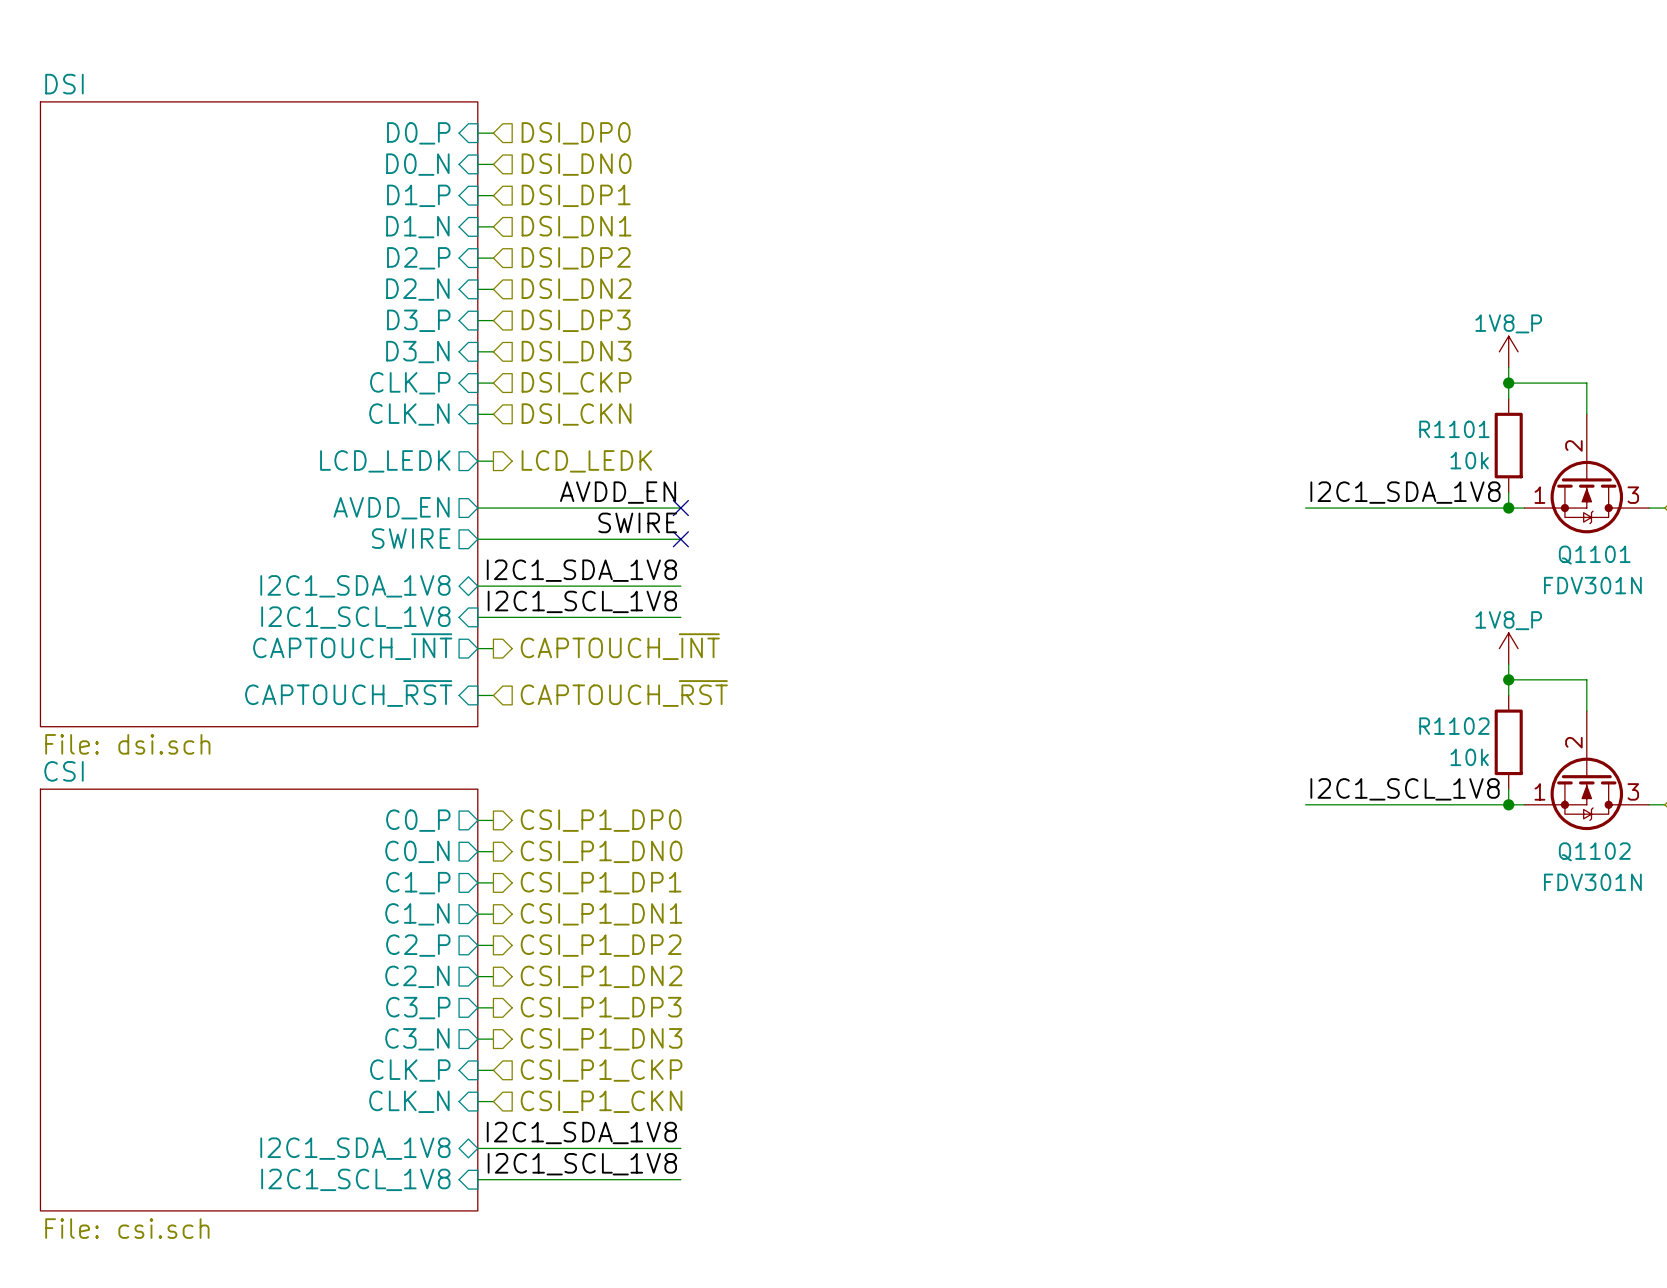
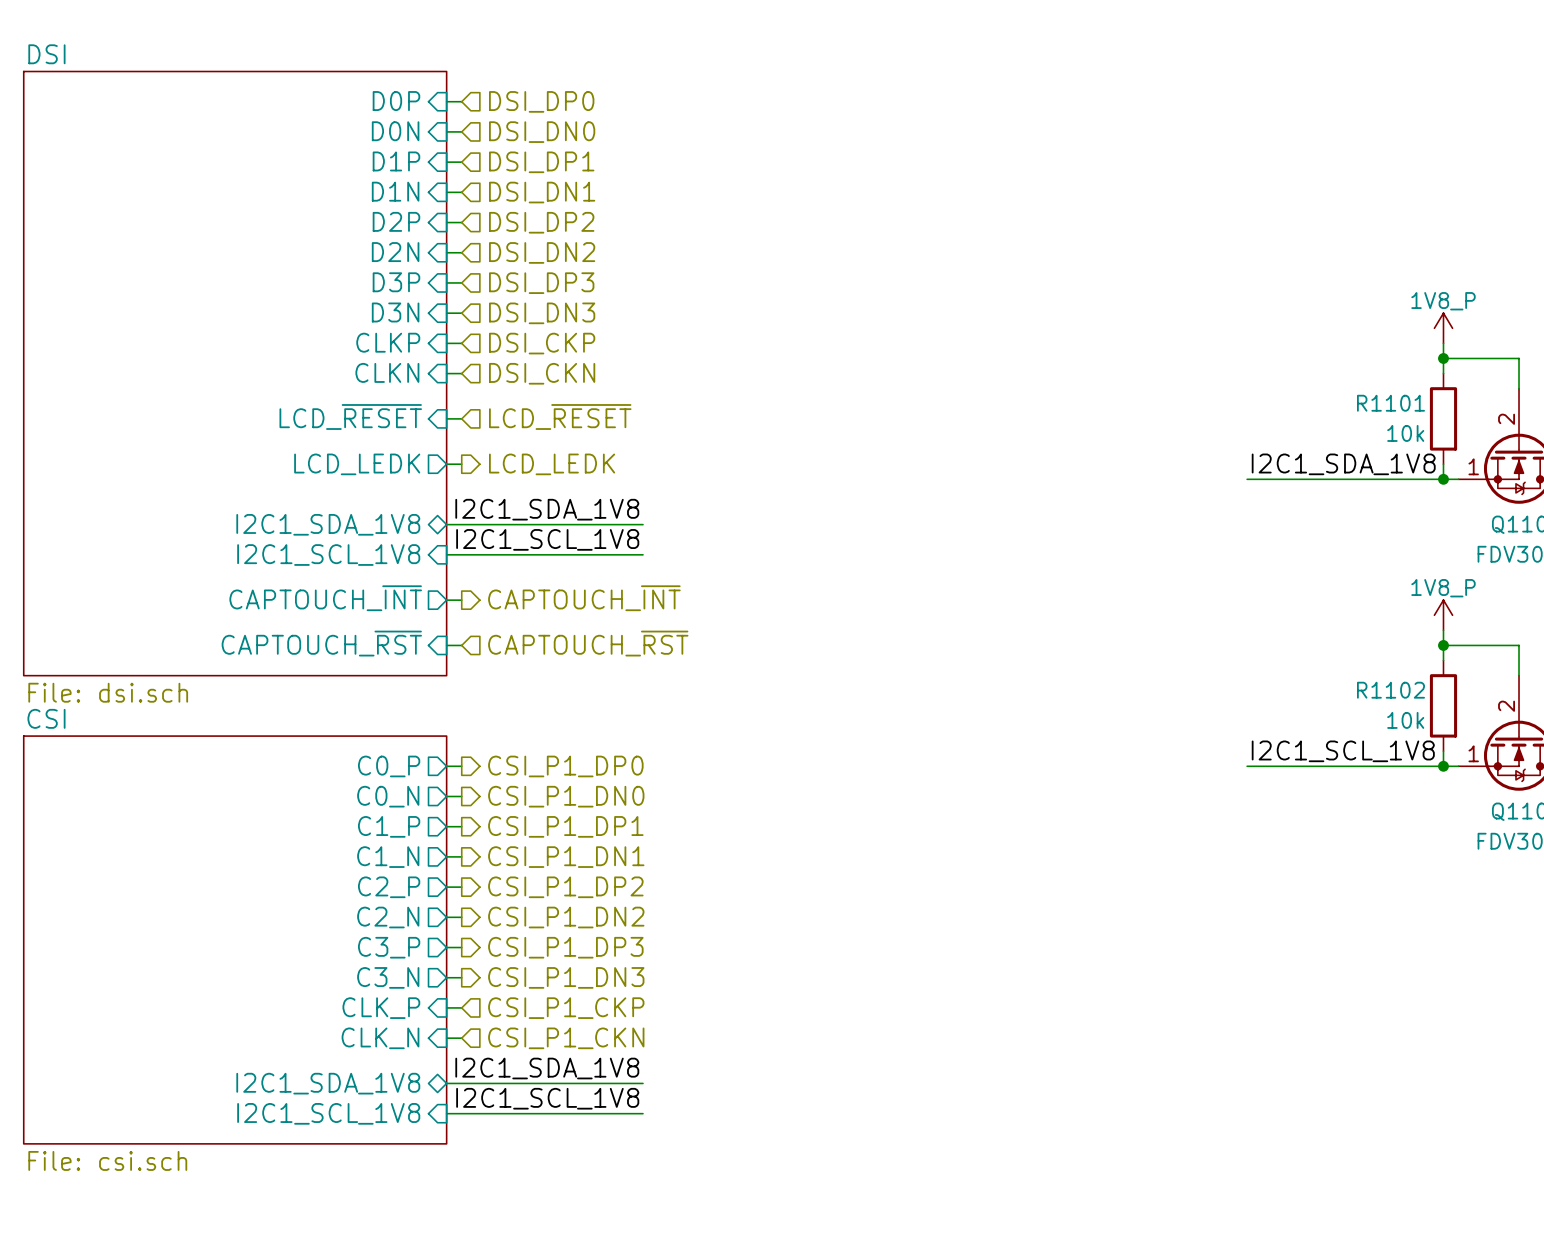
sheet pin: D0_P (418, 133) -> D0P (396, 101)
wire: (477, 133) (493, 133) -> (446, 101) (461, 101)
hierarchical label position: DSI_DP0 (576, 133) -> DSI_DP0 (541, 101)
sheet pin: D0_N (417, 164) -> D0N (395, 131)
wire: (477, 164) (493, 164) -> (446, 131) (461, 131)
hierarchical label position: DSI_DN0 (576, 164) -> DSI_DN0 (542, 132)
sheet pin: D1_P (418, 195) -> D1P (396, 161)
wire: (477, 195) (493, 195) -> (446, 162) (461, 162)
hierarchical label position: DSI_DP1 (576, 195) -> DSI_DP1 (541, 162)
wire: (477, 226) (493, 226) -> (446, 192) (461, 192)
sheet pin: D1_N (417, 227) -> D1N (395, 191)
hierarchical label position: DSI_DN1 (576, 227) -> DSI_DN1 (542, 192)
sheet pin: D2_P (418, 258) -> D2P (396, 221)
wire: (477, 258) (493, 258) -> (446, 222) (461, 222)
hierarchical label position: DSI_DP2 (576, 258) -> DSI_DP2 (541, 222)
sheet pin: D2_N (417, 289) -> D2N (395, 252)
wire: (477, 289) (493, 289) -> (446, 252) (461, 252)
hierarchical label position: DSI_DN2 (576, 289) -> DSI_DN2 (542, 252)
sheet pin: D3_P (418, 320) -> D3P (396, 282)
wire: (477, 320) (493, 320) -> (446, 282) (461, 282)
hierarchical label position: DSI_DP3 (576, 320) -> DSI_DP3 (541, 283)
wire: (477, 351) (493, 351) -> (446, 313) (461, 313)
sheet pin: D3_N (417, 352) -> D3N (395, 312)
hierarchical label position: DSI_DN3 (576, 352) -> DSI_DN3 (542, 313)
sheet pin: none -> CLKP (388, 342)
sheet pin: CLK_P (410, 383) -> none
wire: (477, 383) (493, 383) -> (446, 343) (461, 343)
hierarchical label position: DSI_CKP (576, 383) -> DSI_CKP (542, 343)
sheet pin: none -> CLKN (387, 372)
sheet DSI position: (259, 414) -> (235, 373)
sheet pin: CLK_N (409, 414) -> none
wire: (477, 414) (493, 414) -> (446, 373) (461, 373)
hierarchical label position: DSI_CKN (576, 414) -> DSI_CKN (542, 373)
sheet pin: none -> LCD_~{RESET} (350, 417)
hierarchical label: none -> LCD_~{RESET} (560, 417)
sheet pin position: LCD_LEDK (385, 461) -> LCD_LEDK (357, 464)
wire: (477, 461) (493, 461) -> (446, 418) (461, 418)
hierarchical label position: LCD_LEDK (586, 461) -> LCD_LEDK (552, 464)
wire: none -> (446, 464) (461, 464)
label: AVDD_EN (618, 492) -> none
sheet pin: AVDD_EN (391, 508) -> none
wire: (477, 508) (680, 508) -> none
no-connect mark: (680, 508) -> none
label: SWIRE (637, 522) -> none
sheet pin: SWIRE (411, 538) -> none
wire: (477, 539) (680, 539) -> (446, 524) (642, 524)
label: none -> I2C1_SDA_1V8 (547, 509)
no-connect mark: (680, 539) -> none
sheet pin: none -> I2C1_SDA_1V8 (328, 524)
label: I2C1_SDA_1V8 (581, 570) -> I2C1_SCL_1V8 (547, 539)
sheet pin shape: bidirectional (355, 586) -> input (328, 555)
sheet pin: I2C1_SDA_1V8 (355, 586) -> I2C1_SCL_1V8 (328, 555)
label: I2C1_SCL_1V8 (582, 601) -> none
sheet pin: I2C1_SCL_1V8 (355, 617) -> none
wire: (477, 617) (680, 617) -> none
sheet pin position: CAPTOUCH_~{INT} (352, 646) -> CAPTOUCH_~{INT} (325, 598)
hierarchical label position: CAPTOUCH_~{INT} (620, 646) -> CAPTOUCH_~{INT} (584, 598)
wire: (477, 648) (493, 648) -> (446, 600) (461, 600)
sheet pin position: CAPTOUCH_~{RST} (348, 693) -> CAPTOUCH_~{RST} (321, 643)
hierarchical label position: CAPTOUCH_~{RST} (624, 693) -> CAPTOUCH_~{RST} (588, 643)
wire: (477, 695) (493, 695) -> (446, 645) (461, 645)
sheet pin position: C0_P (418, 820) -> C0_P (389, 766)
wire: (477, 820) (493, 820) -> (446, 766) (461, 766)
hierarchical label position: CSI_P1_DP0 (601, 820) -> CSI_P1_DP0 (565, 766)
sheet pin position: C0_N (417, 851) -> C0_N (388, 796)
wire: (477, 851) (493, 851) -> (446, 796) (461, 796)
hierarchical label position: CSI_P1_DN0 (601, 851) -> CSI_P1_DN0 (566, 796)
wire: (477, 882) (493, 882) -> (446, 826) (461, 826)
sheet pin position: C1_P (418, 883) -> C1_P (389, 826)
hierarchical label position: CSI_P1_DP1 (601, 883) -> CSI_P1_DP1 (565, 826)
sheet pin position: C1_N (417, 914) -> C1_N (388, 857)
wire: (477, 914) (493, 914) -> (446, 856) (461, 856)
hierarchical label position: CSI_P1_DN1 (601, 914) -> CSI_P1_DN1 (566, 857)
sheet pin position: C2_P (418, 945) -> C2_P (389, 887)
wire: (477, 945) (493, 945) -> (446, 887) (461, 887)
hierarchical label position: CSI_P1_DP2 (601, 945) -> CSI_P1_DP2 (565, 887)
sheet pin position: C2_N (417, 976) -> C2_N (388, 917)
wire: (477, 976) (493, 976) -> (446, 917) (461, 917)
hierarchical label position: CSI_P1_DN2 (601, 976) -> CSI_P1_DN2 (566, 917)
sheet CSI position: (259, 1000) -> (235, 939)
wire: (477, 1007) (493, 1007) -> (446, 947) (461, 947)
sheet pin position: C3_P (418, 1008) -> C3_P (389, 947)
hierarchical label position: CSI_P1_DP3 (601, 1008) -> CSI_P1_DP3 (565, 947)
sheet pin position: C3_N (417, 1039) -> C3_N (388, 977)
wire: (477, 1039) (493, 1039) -> (446, 977) (461, 977)
hierarchical label position: CSI_P1_DN3 (601, 1039) -> CSI_P1_DN3 (566, 977)
sheet pin position: CLK_P (410, 1070) -> CLK_P (381, 1008)
wire: (477, 1070) (493, 1070) -> (446, 1007) (461, 1007)
hierarchical label position: CSI_P1_CKP (601, 1070) -> CSI_P1_CKP (566, 1008)
sheet pin position: CLK_N (409, 1101) -> CLK_N (380, 1038)
wire: (477, 1101) (493, 1101) -> (446, 1038) (461, 1038)
hierarchical label position: CSI_P1_CKN (601, 1101) -> CSI_P1_CKN (566, 1038)
label position: I2C1_SDA_1V8 (581, 1132) -> I2C1_SDA_1V8 (547, 1068)
sheet pin position: I2C1_SDA_1V8 (355, 1148) -> I2C1_SDA_1V8 (328, 1083)
wire: (477, 1148) (680, 1148) -> (446, 1083) (642, 1083)
label position: I2C1_SCL_1V8 (582, 1164) -> I2C1_SCL_1V8 (547, 1098)
sheet pin position: I2C1_SCL_1V8 (355, 1179) -> I2C1_SCL_1V8 (328, 1113)
wire: (477, 1179) (680, 1179) -> (446, 1113) (642, 1113)

